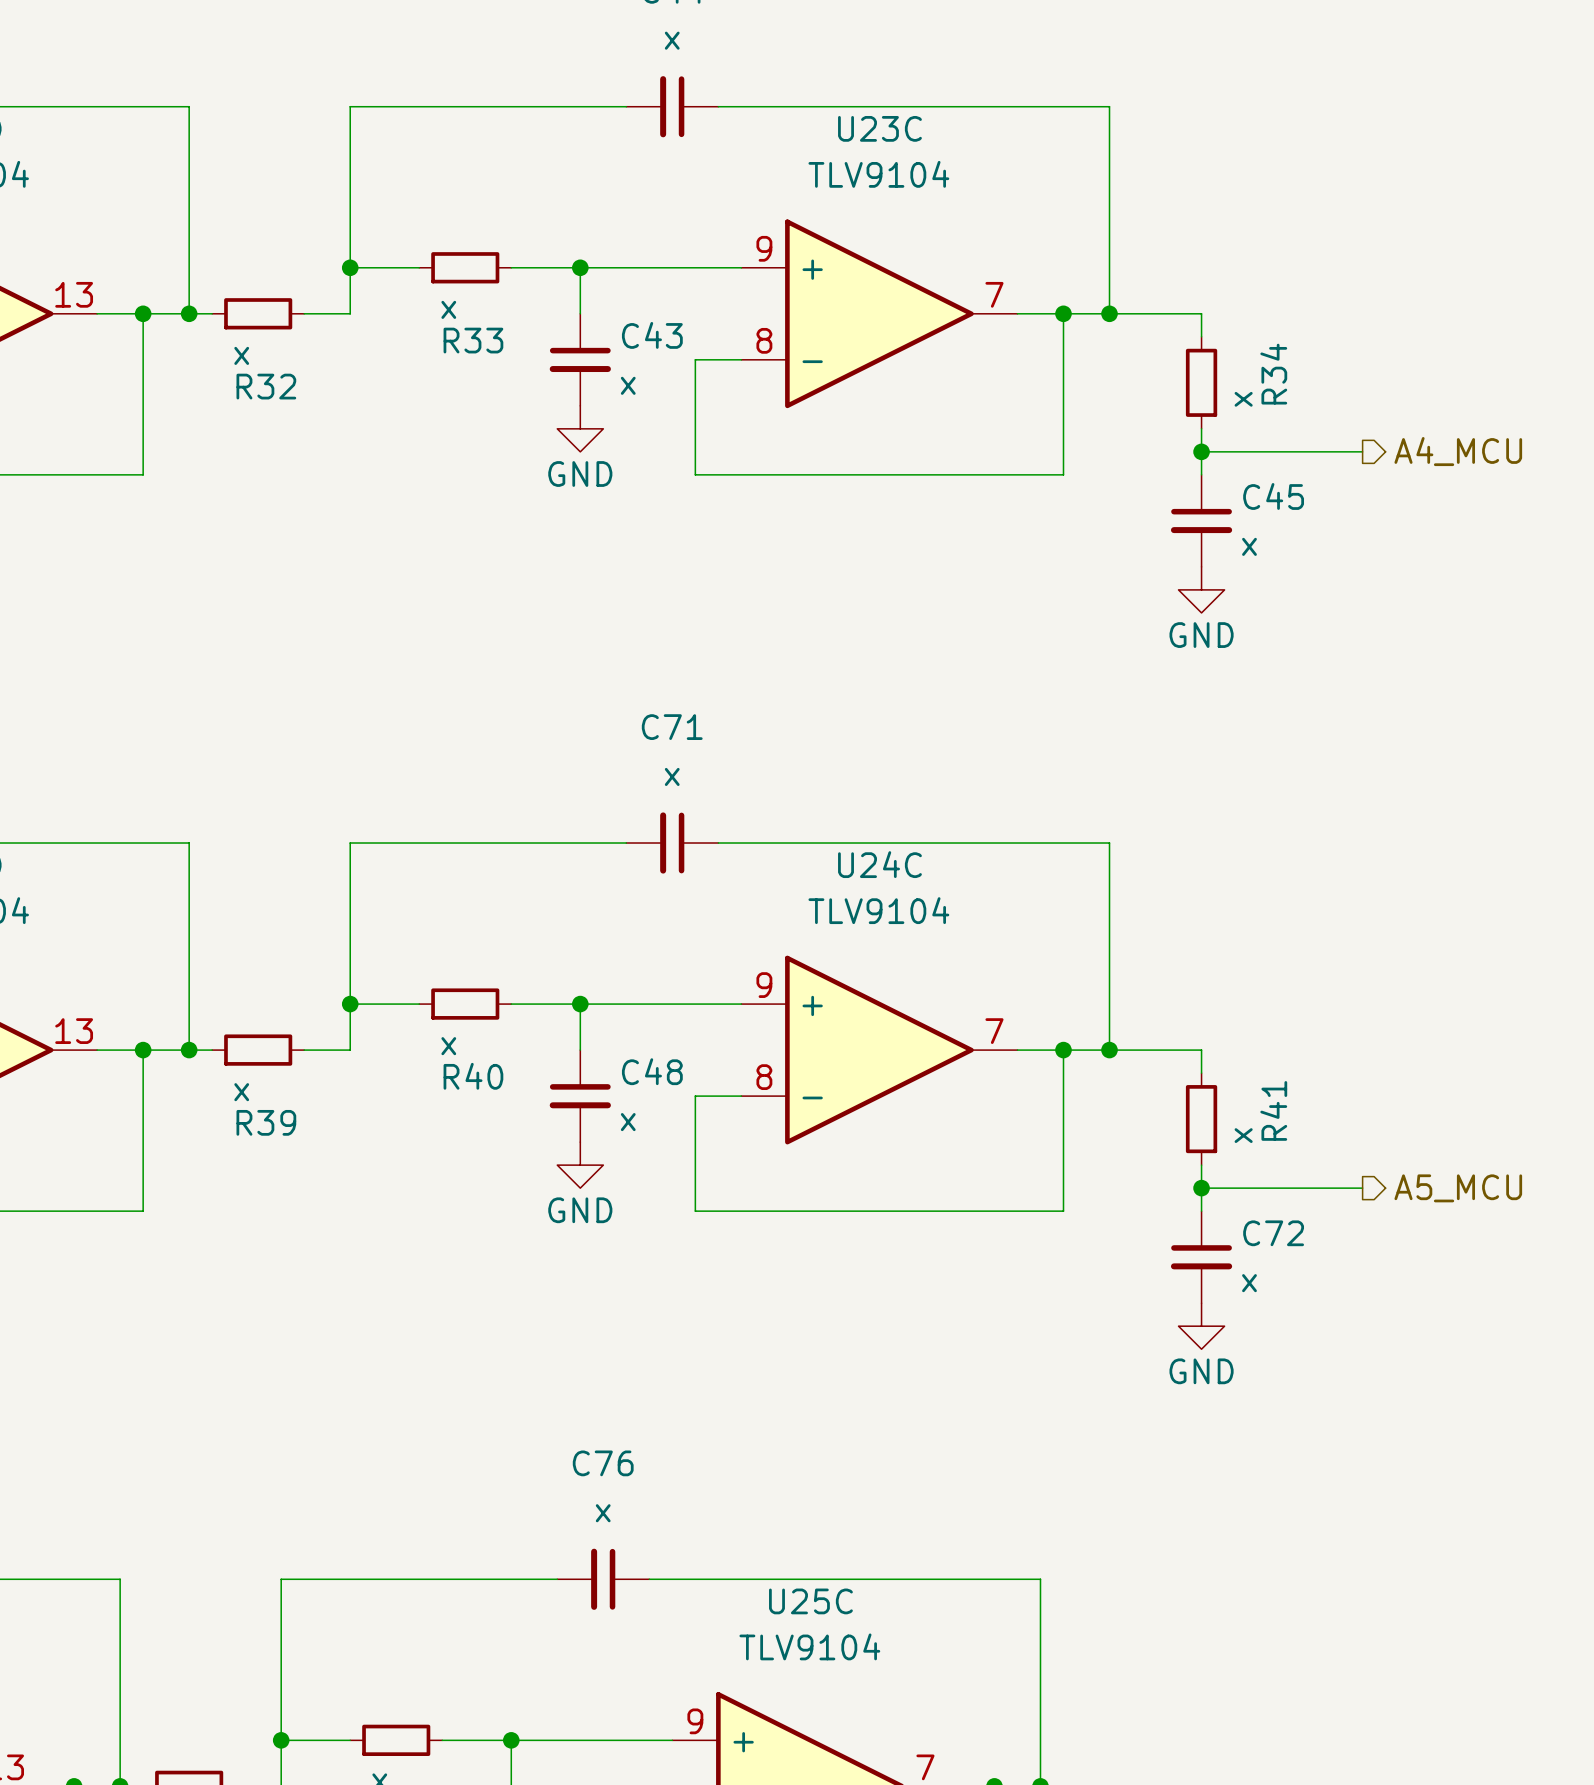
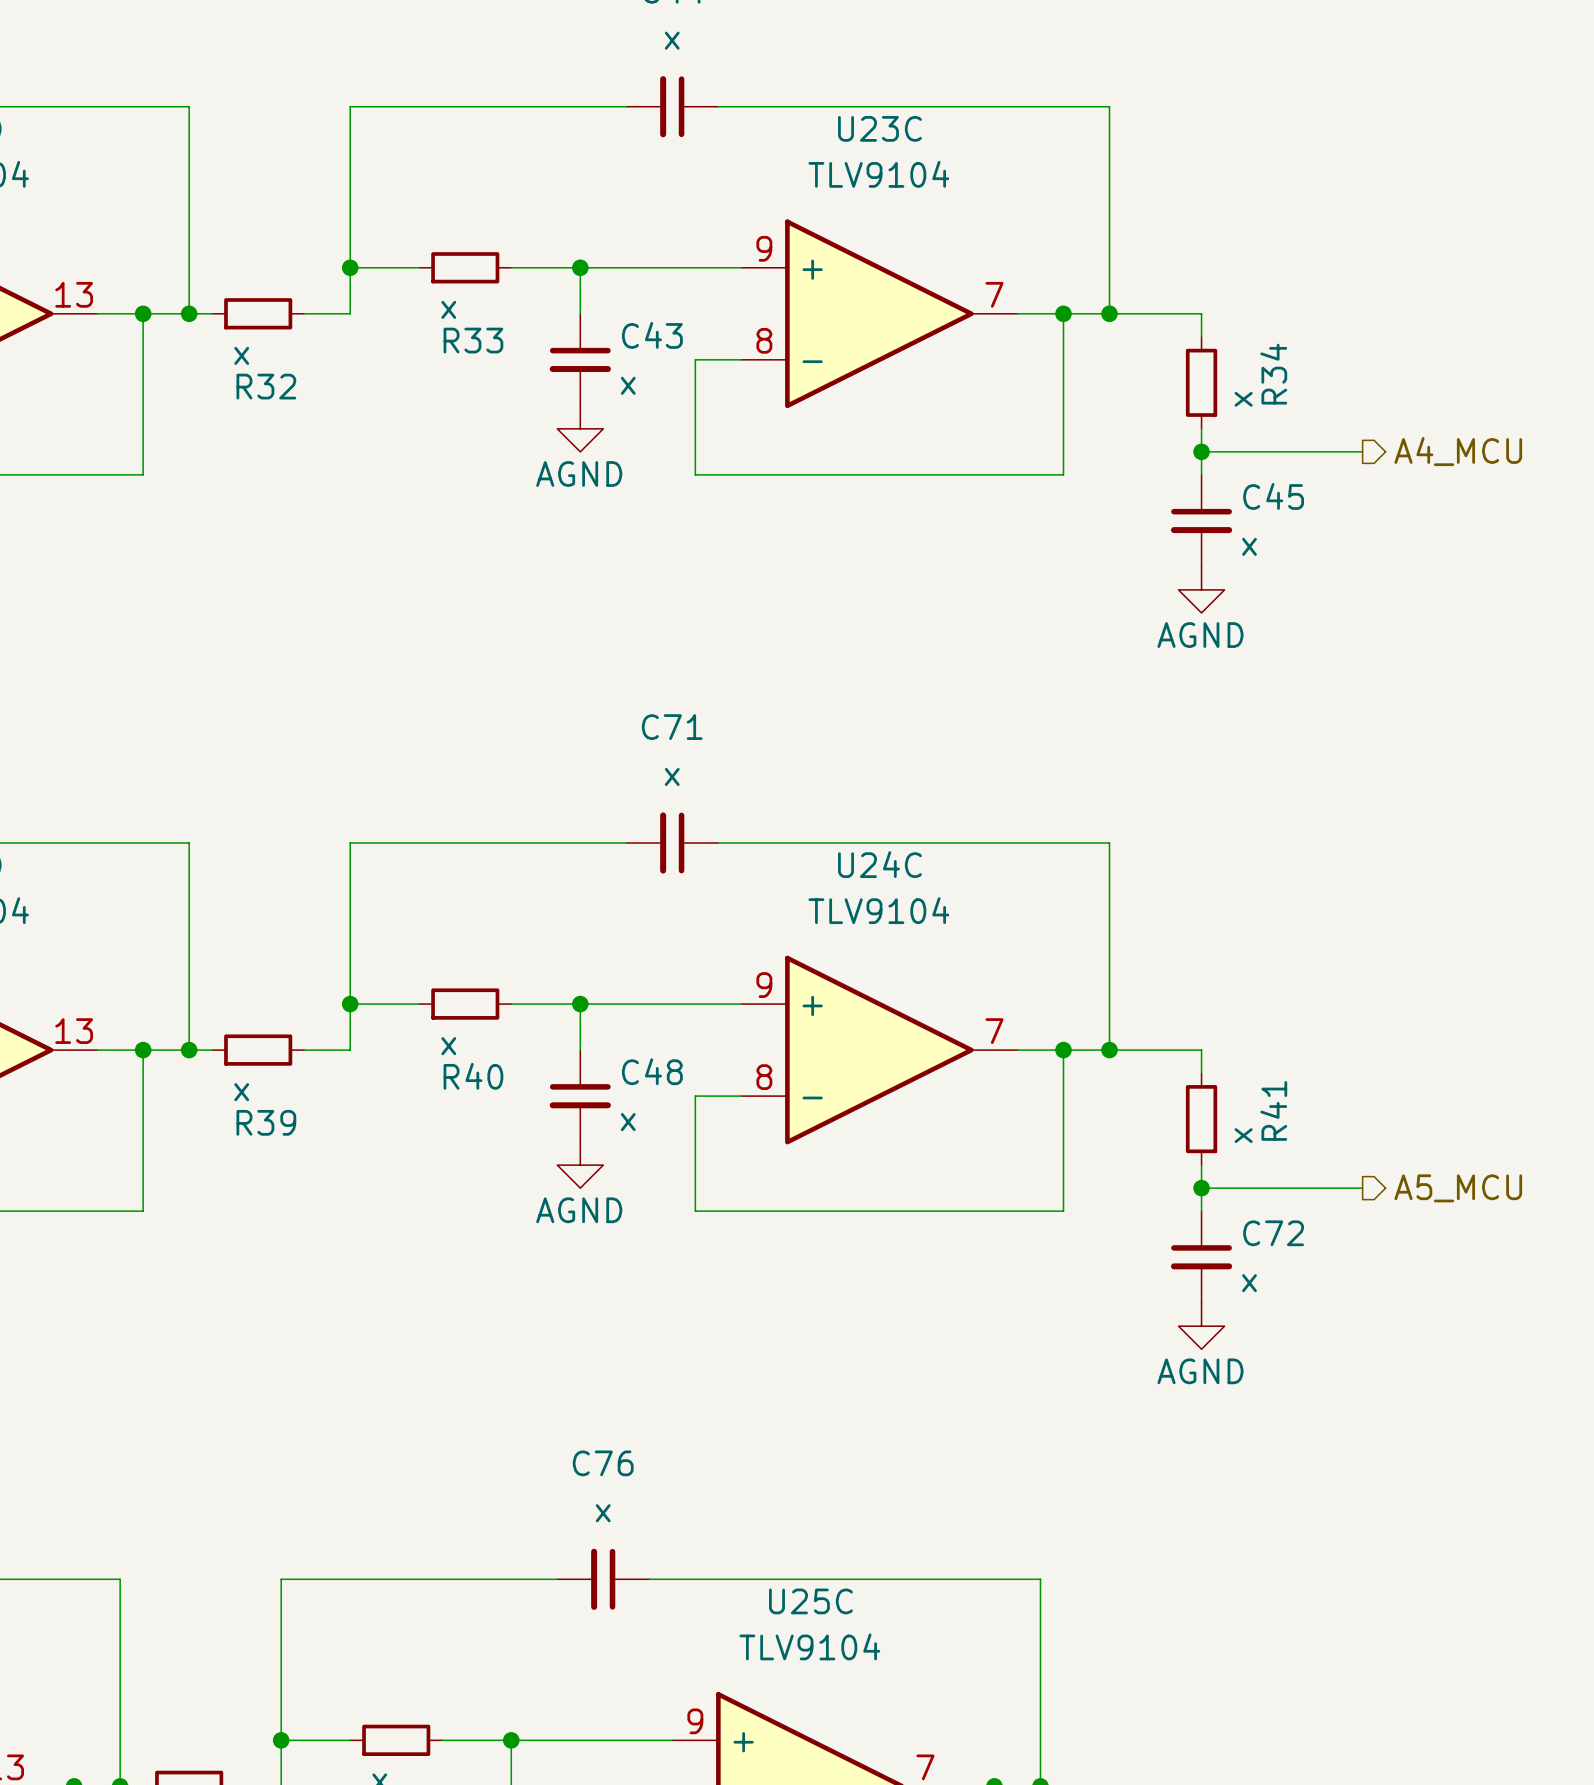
power symbol: GND (580, 428) -> AGND (580, 428)
power symbol: GND (1201, 589) -> AGND (1201, 589)
power symbol: GND (580, 1165) -> AGND (580, 1165)
power symbol: GND (1201, 1326) -> AGND (1201, 1326)

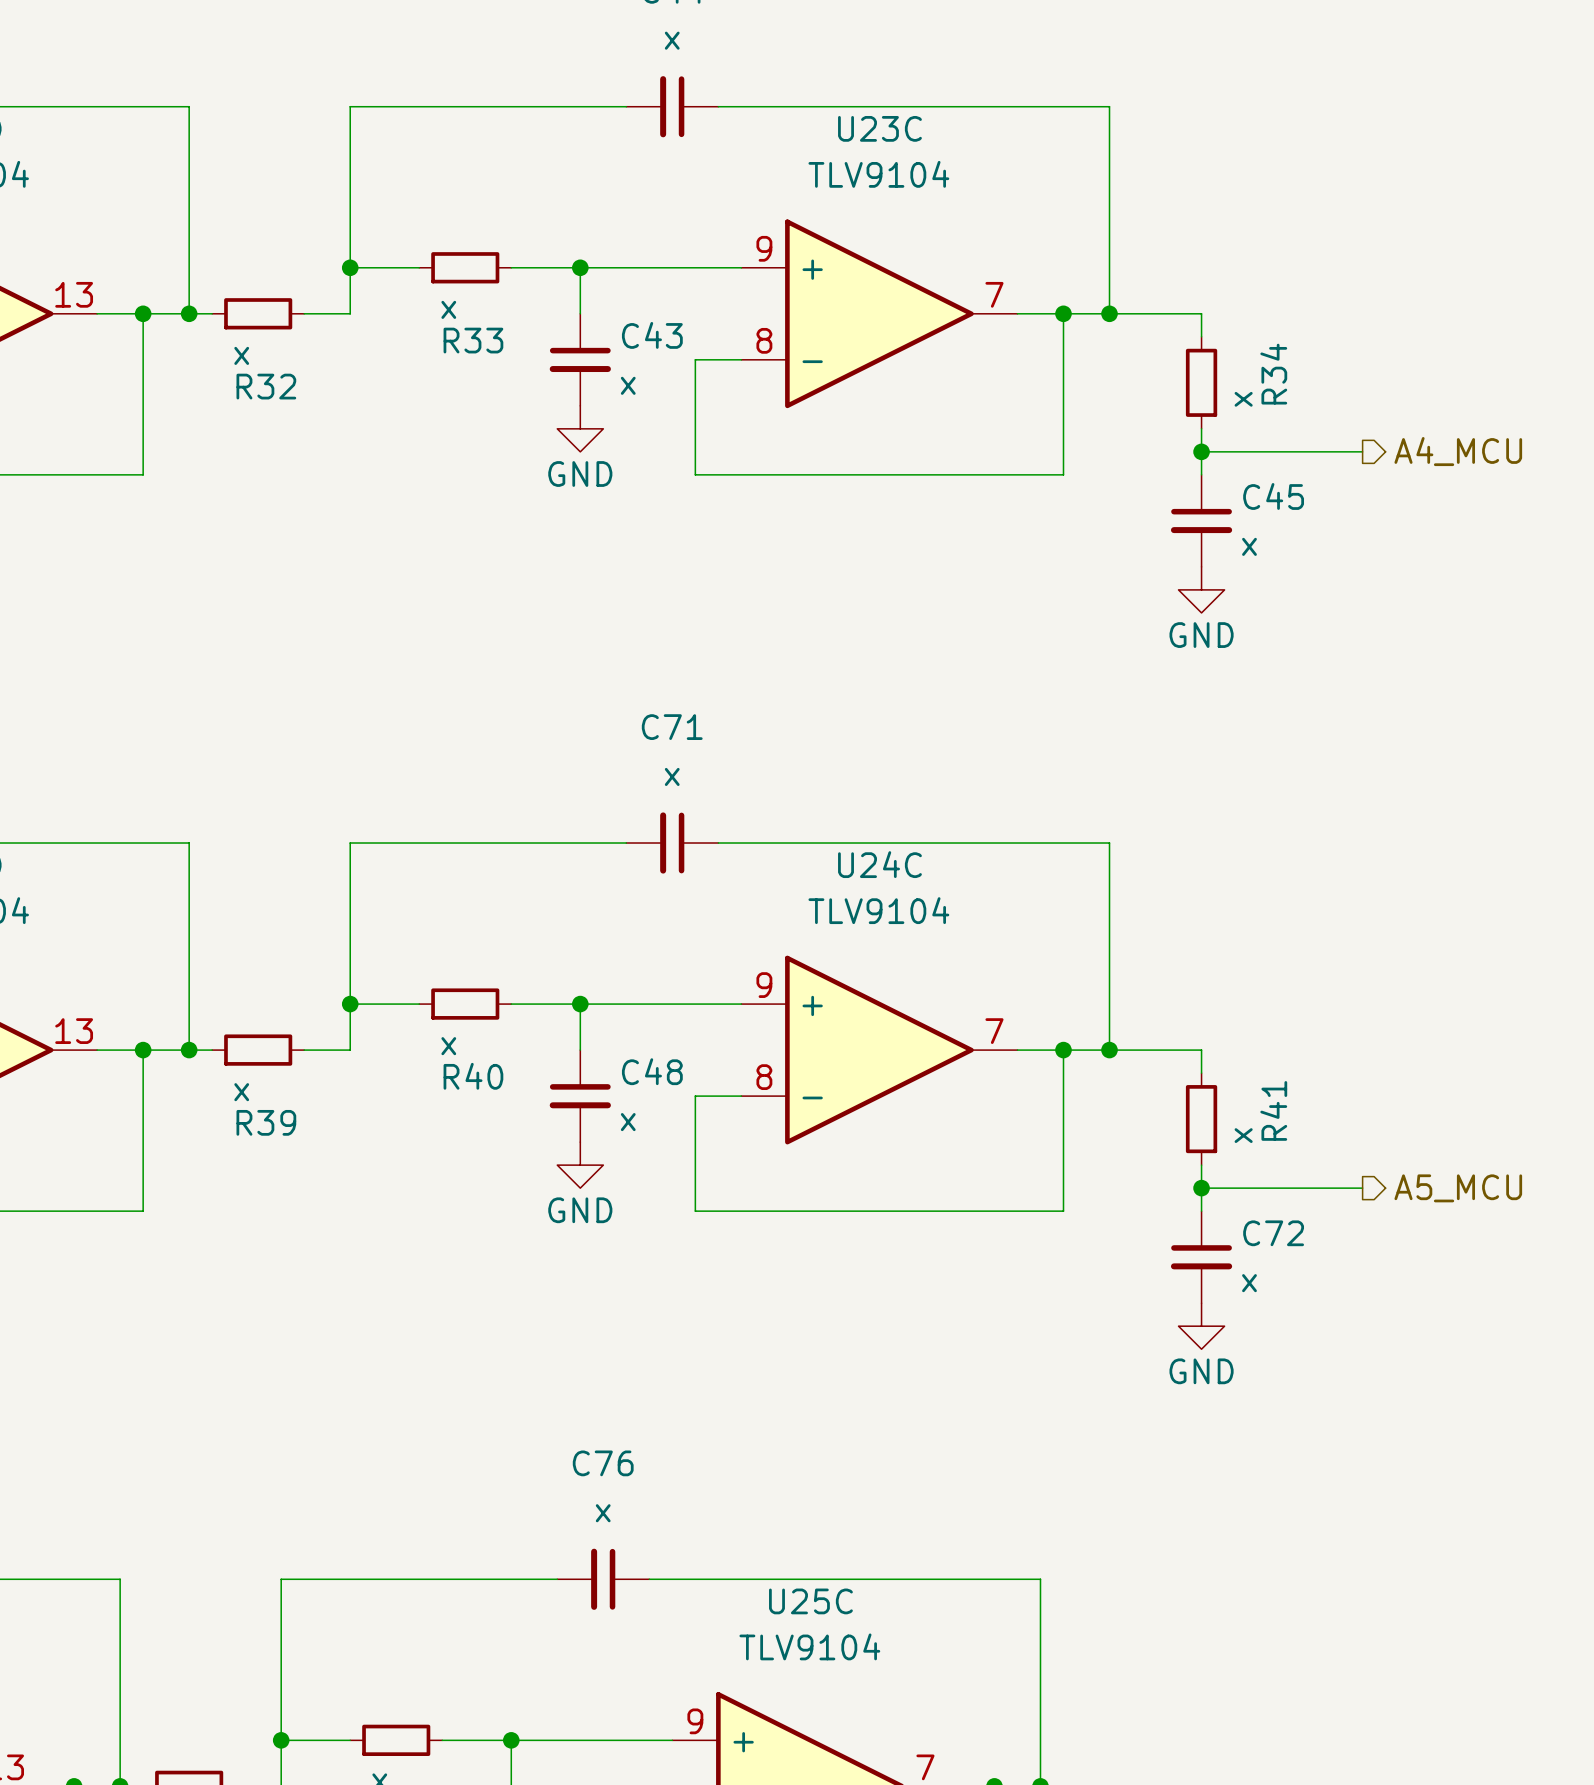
power symbol: AGND (580, 428) -> GND (580, 428)
power symbol: AGND (1201, 589) -> GND (1201, 589)
power symbol: AGND (580, 1165) -> GND (580, 1165)
power symbol: AGND (1201, 1326) -> GND (1201, 1326)

